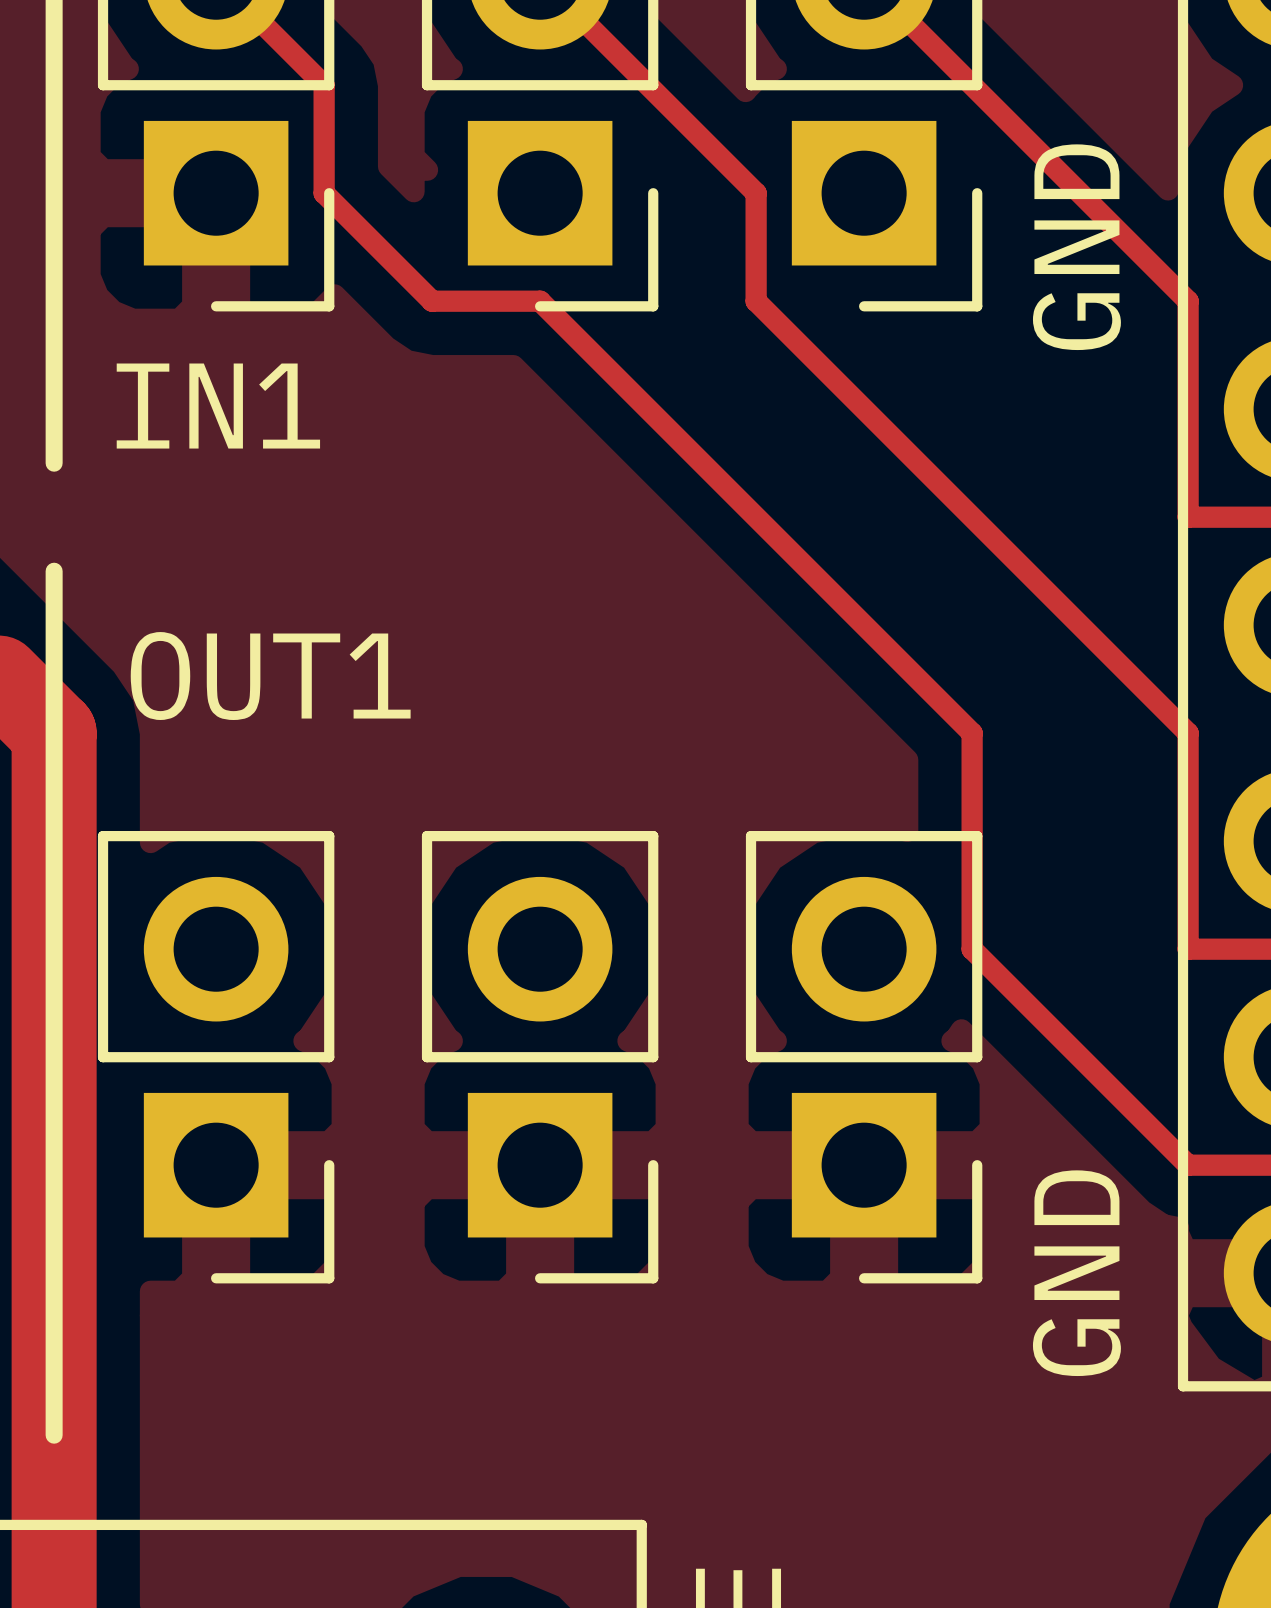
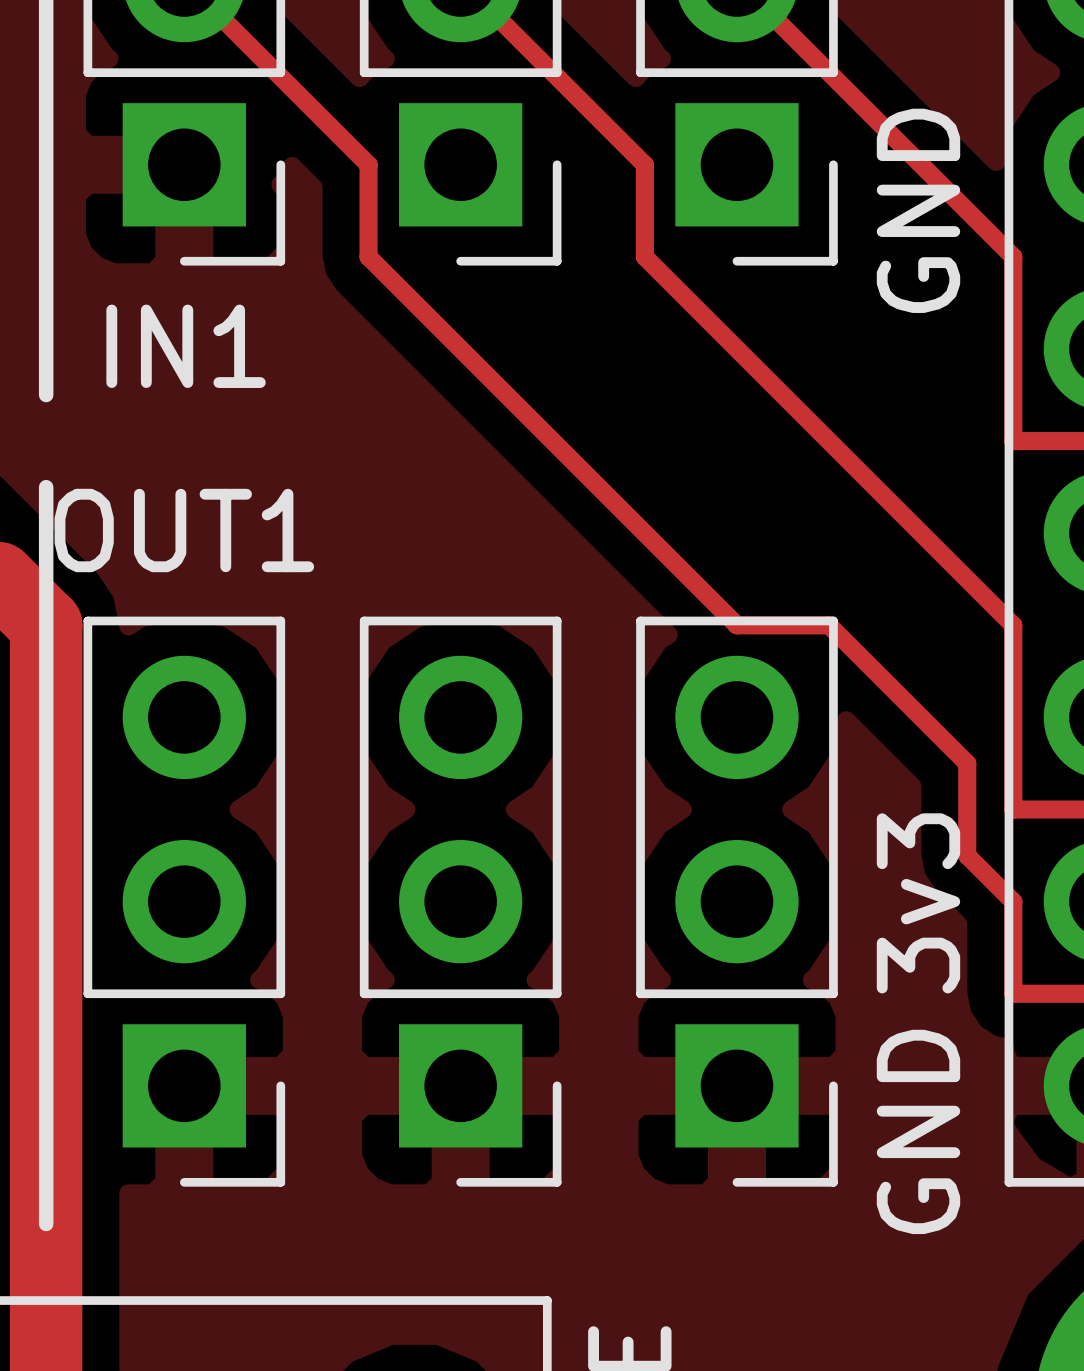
track: (324, 85) (324, 193) (432, 301) (540, 301) (972, 733) (972, 949) (1188, 1165) -> (276, 72) (368, 164) (368, 256) (736, 625) (829, 625) (967, 763) (967, 855) (1013, 901) (1013, 993)
text position: OUT1 (270, 676) -> OUT1 (184, 530)
part footprint: [97, 830, 335, 1284] -> [83, 616, 286, 1187]
part footprint: [421, 830, 659, 1284] -> [359, 616, 562, 1187]
part footprint: [745, 830, 983, 1284] -> [636, 616, 838, 1187]
text: none -> 3v3 (918, 903)
text position: GND (1076, 1273) -> GND (918, 1131)

